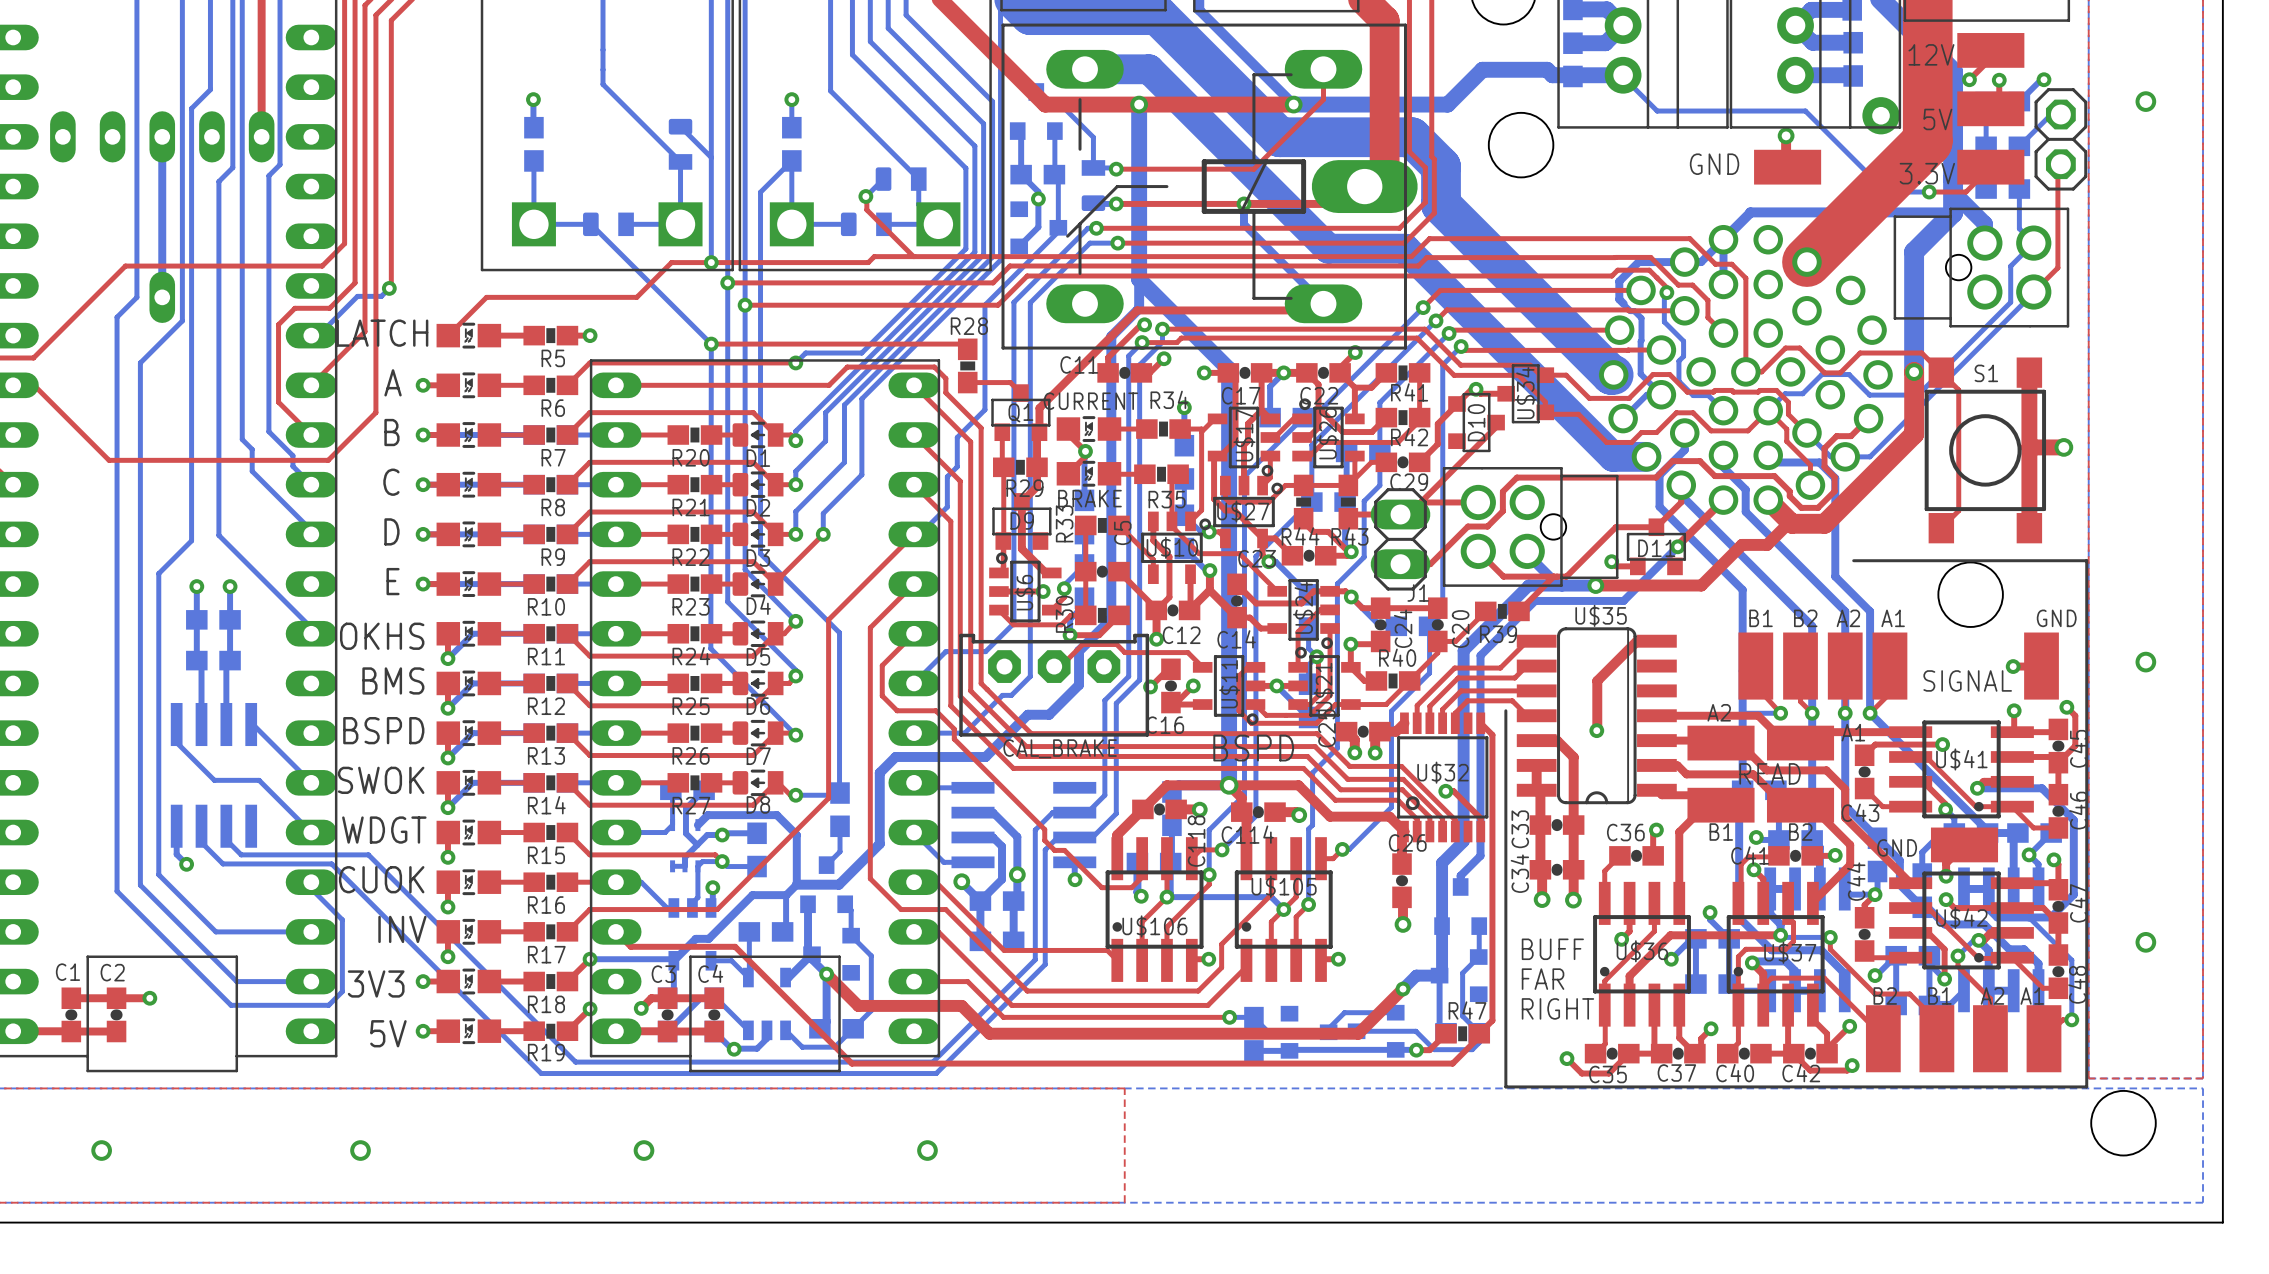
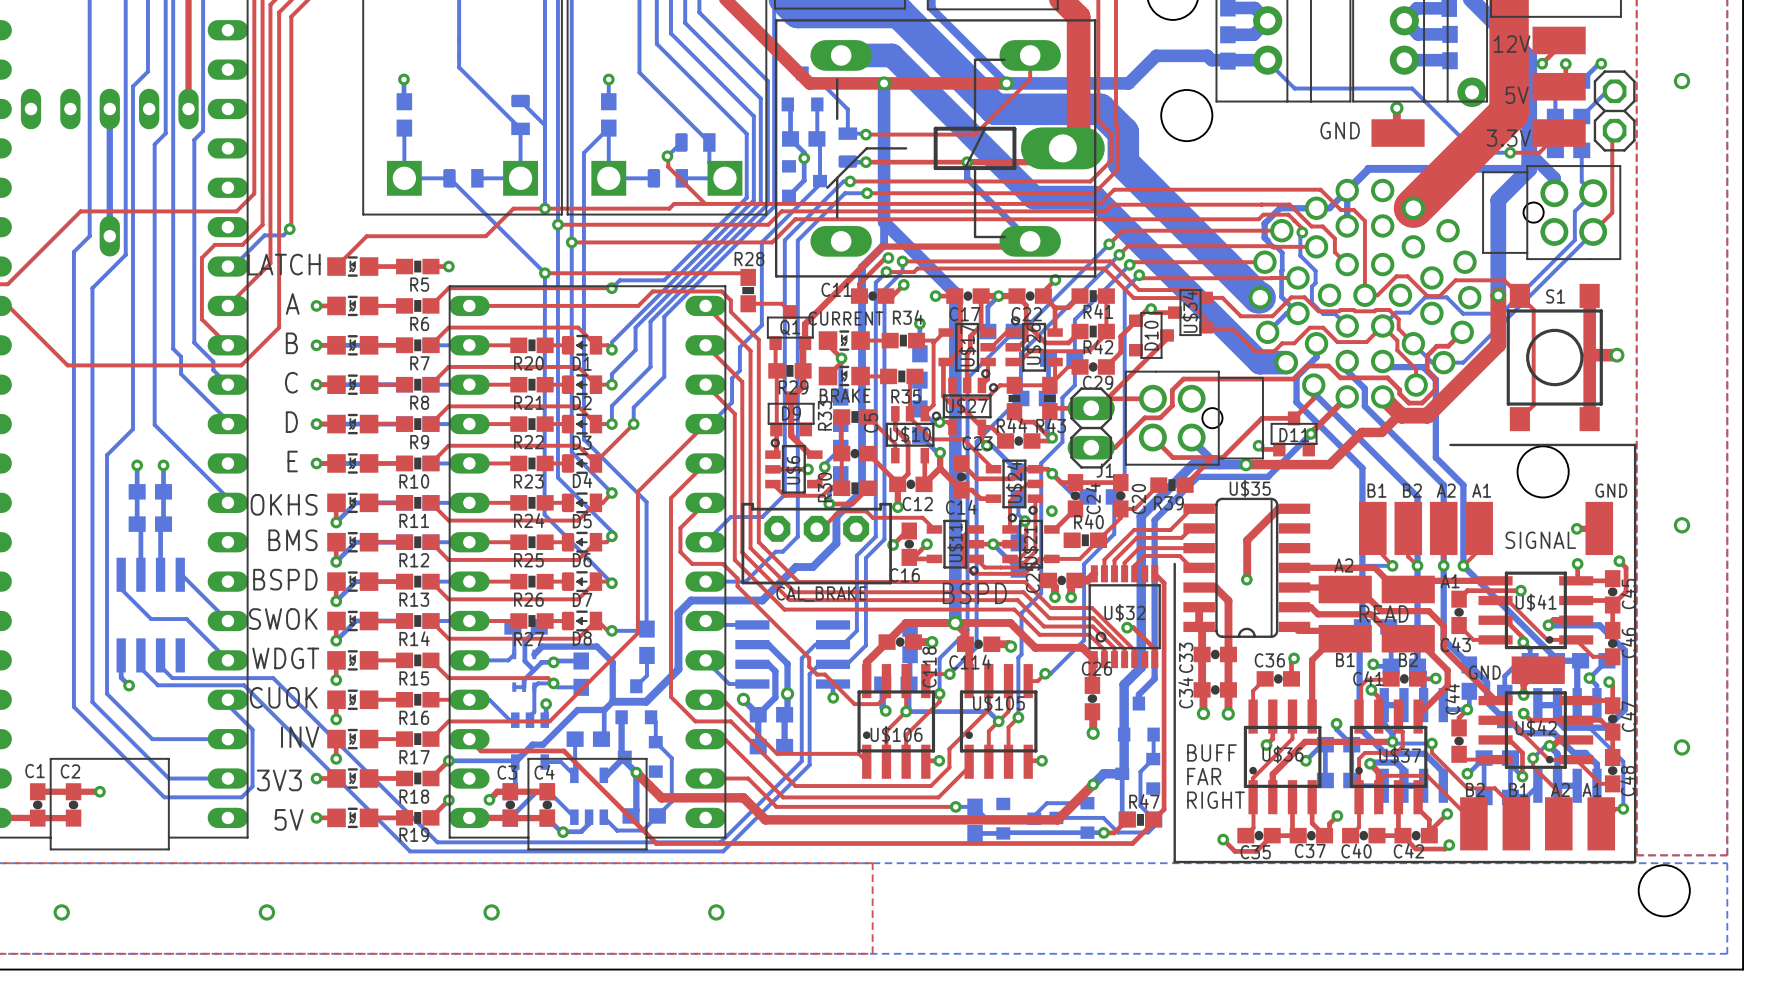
top track: (1377, 644) (1350, 644) (1350, 667) (1364, 680) (1376, 680) -> (1073, 511) (1054, 529)

